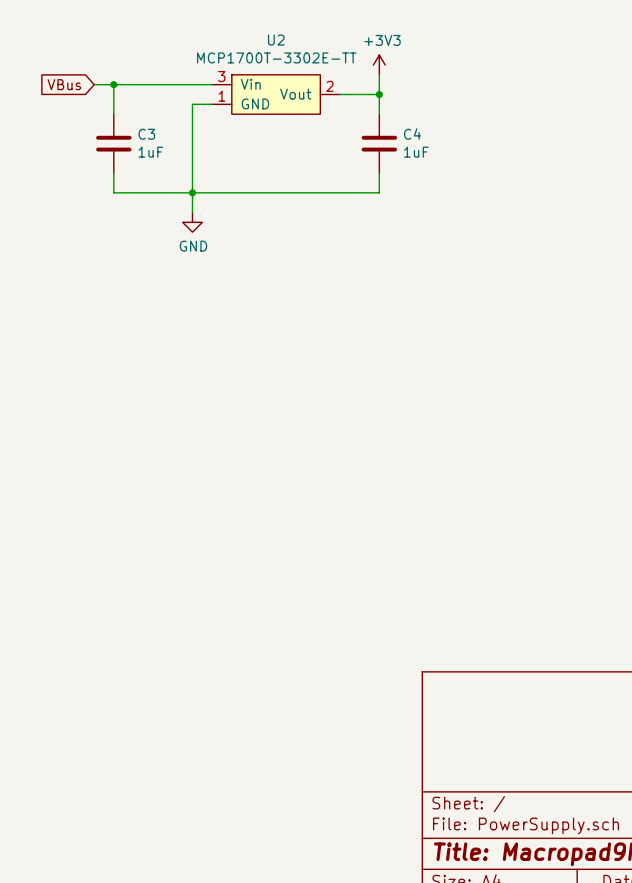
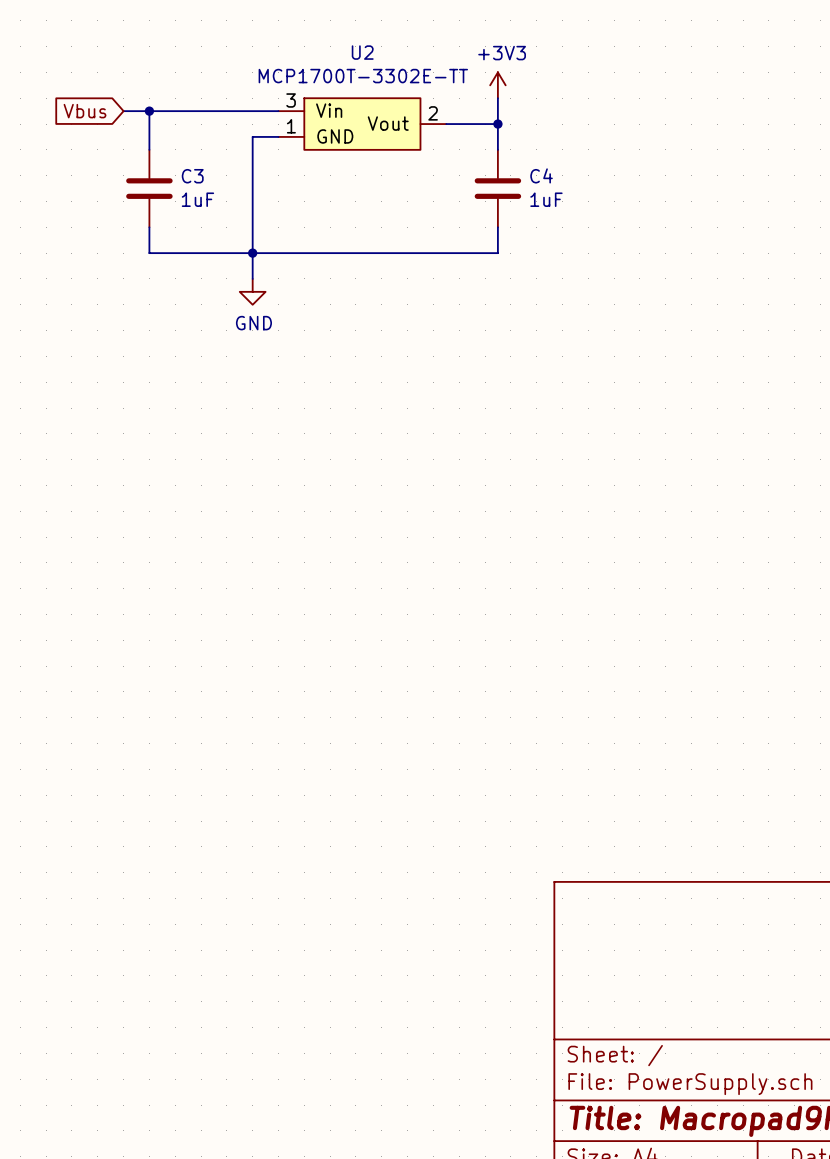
global label: VBus (64, 84) -> Vbus (85, 111)

